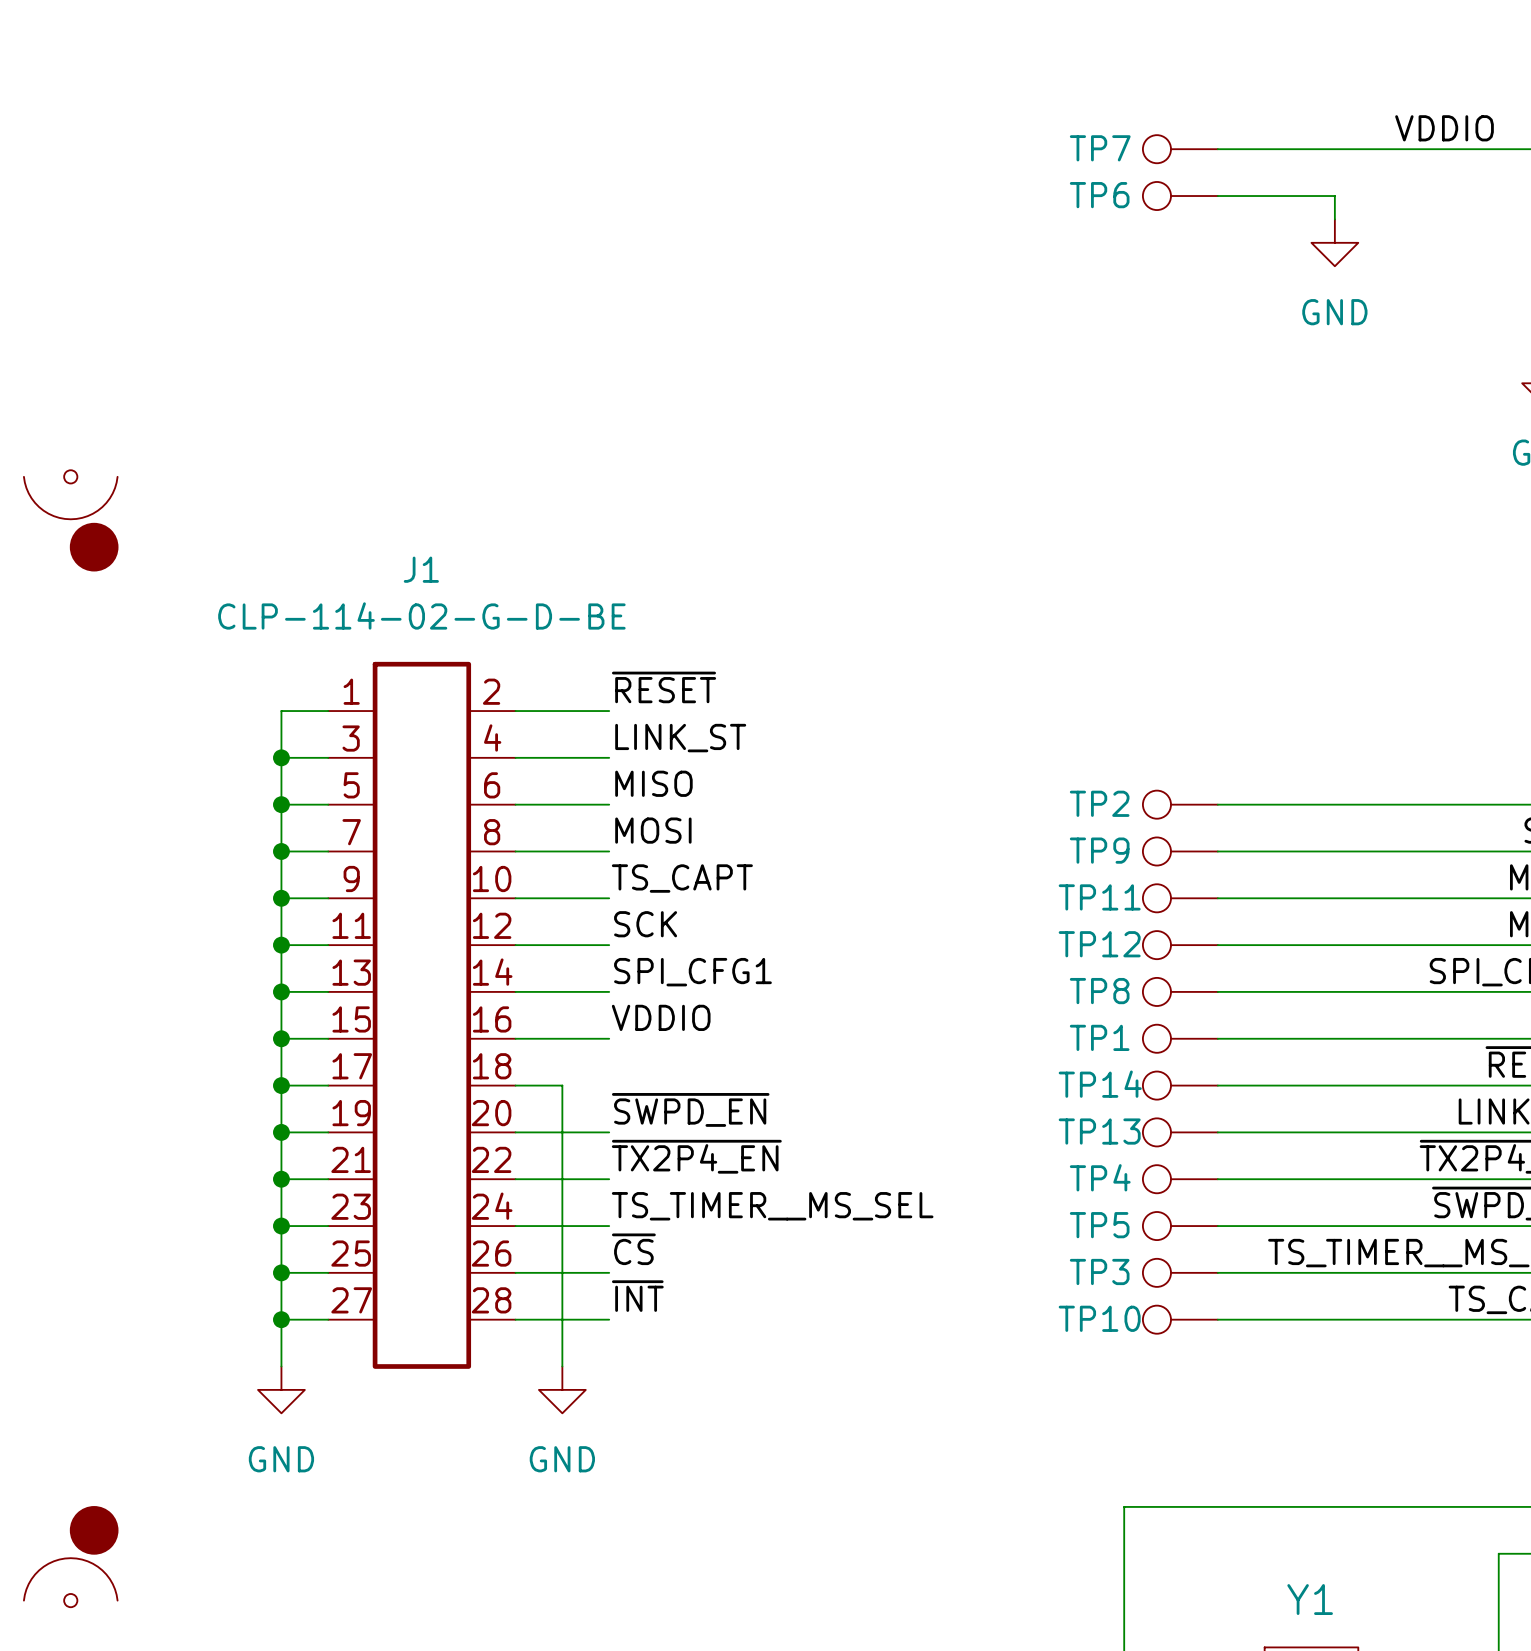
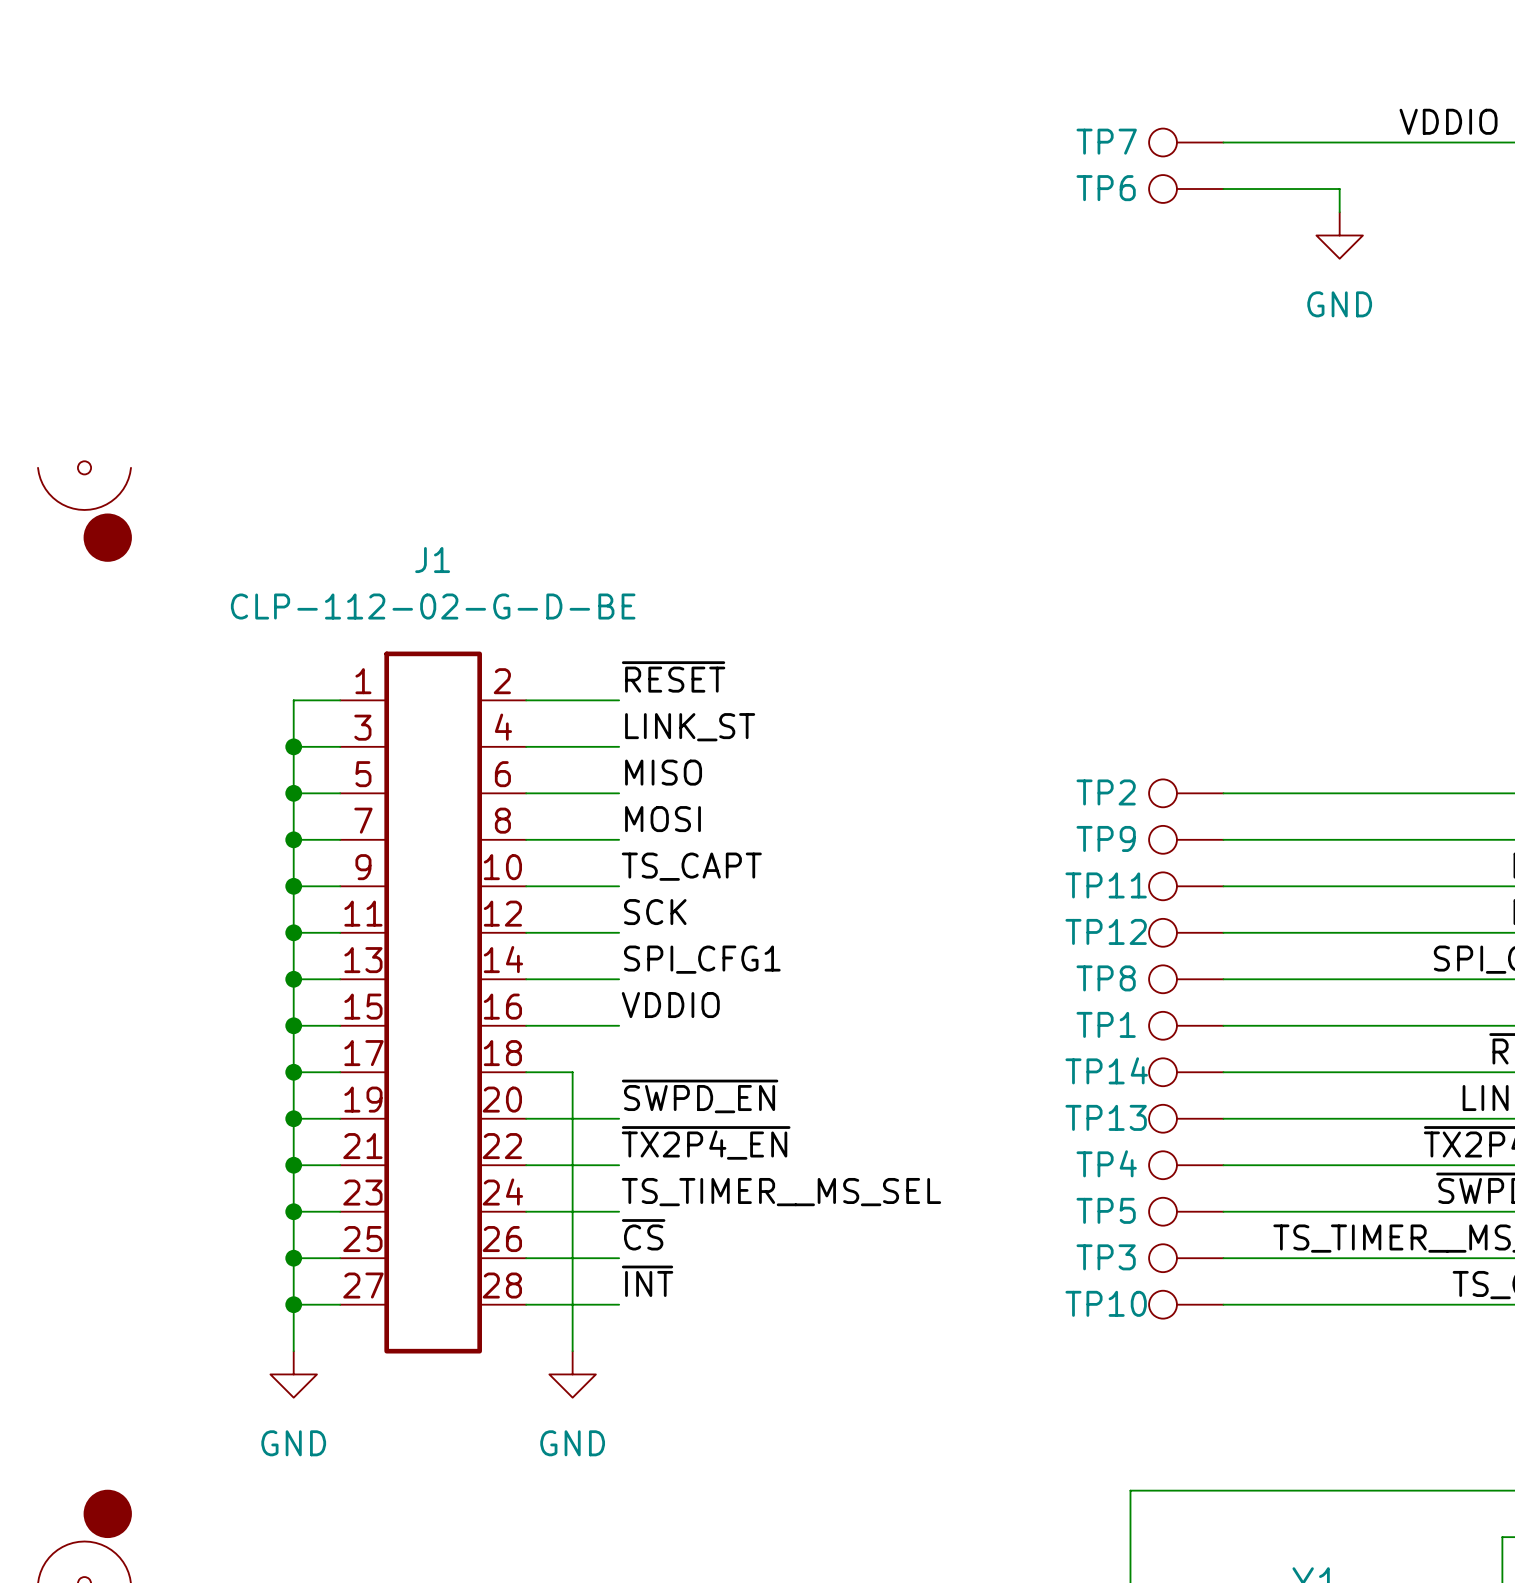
J1 value: CLP-114-02-G-D-BE (421, 615) -> CLP-112-02-G-D-BE (433, 606)

